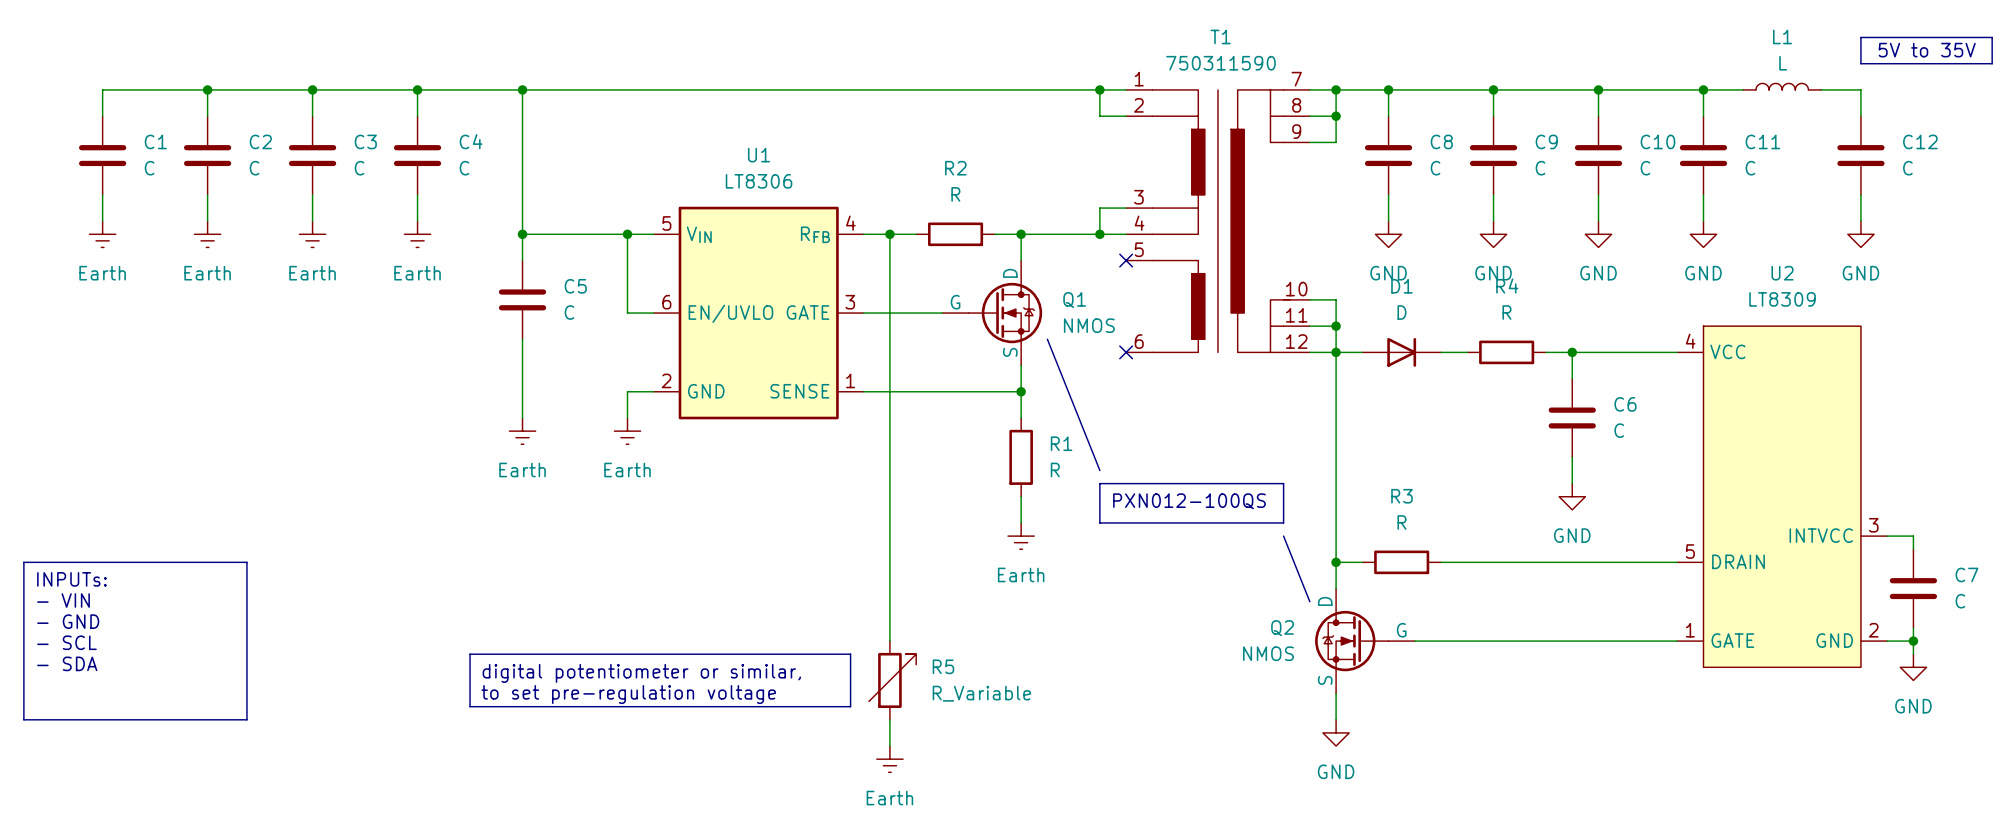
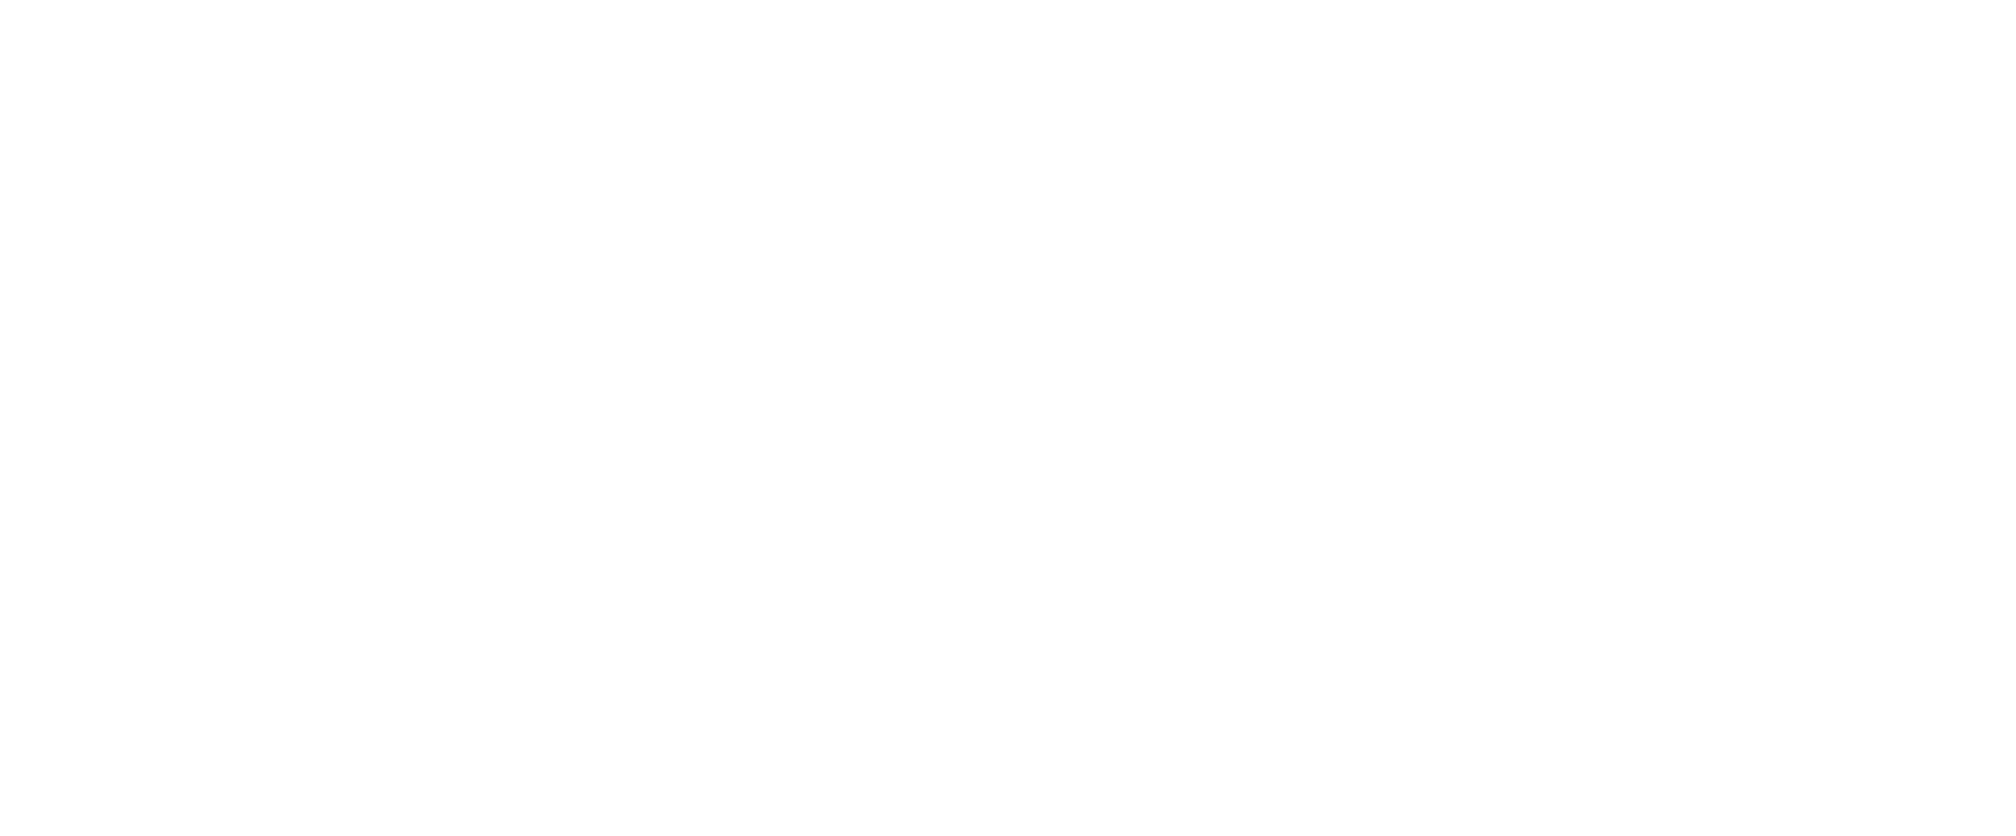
line: (1860, 37) (1992, 37) (1992, 63) (1860, 63) (1860, 37) -> none
text: 5V to 35V (1927, 50) -> none
L1: L (1782, 86) -> none
wire: (207, 89) (207, 116) -> none
junction: (207, 89) -> none
wire: (312, 89) (312, 116) -> none
junction: (312, 89) -> none
wire: (417, 89) (417, 116) -> none
junction: (417, 89) -> none
wire: (522, 89) (522, 260) -> none
junction: (522, 89) -> none
wire: (1099, 89) (1099, 116) (1126, 116) -> none
junction: (1099, 89) -> none
wire: (1126, 89) (102, 89) (102, 116) -> none
wire: (1309, 89) (1742, 89) -> none
wire: (1336, 89) (1336, 142) (1309, 142) -> none
junction: (1336, 89) -> none
wire: (1388, 89) (1388, 116) -> none
junction: (1388, 89) -> none
wire: (1493, 89) (1493, 116) -> none
junction: (1493, 89) -> none
wire: (1598, 89) (1598, 116) -> none
junction: (1598, 89) -> none
wire: (1703, 89) (1703, 116) -> none
junction: (1703, 89) -> none
wire: (1821, 89) (1860, 89) (1860, 116) -> none
wire: (1309, 116) (1336, 116) -> none
junction: (1336, 116) -> none
C1: C (102, 155) -> none
C2: C (207, 155) -> none
C3: C (312, 155) -> none
C4: C (417, 155) -> none
C8: C (1388, 155) -> none
C9: C (1493, 155) -> none
C10: C (1598, 155) -> none
C11: C (1703, 155) -> none
C12: C (1860, 155) -> none
wire: (102, 194) (102, 221) -> none
wire: (207, 194) (207, 221) -> none
wire: (312, 194) (312, 221) -> none
wire: (417, 194) (417, 221) -> none
wire: (1388, 194) (1388, 221) -> none
wire: (1493, 194) (1493, 221) -> none
wire: (1598, 194) (1598, 221) -> none
wire: (1703, 194) (1703, 221) -> none
wire: (1860, 194) (1860, 221) -> none
wire: (1126, 208) (1099, 208) (1099, 234) -> none
T1: 750311590 (1217, 221) -> none
power symbol: Earth (102, 234) -> none
power symbol: Earth (207, 234) -> none
power symbol: Earth (312, 234) -> none
power symbol: Earth (417, 234) -> none
wire: (522, 234) (653, 234) -> none
junction: (522, 234) -> none
wire: (627, 234) (627, 313) (653, 313) -> none
junction: (627, 234) -> none
wire: (863, 234) (916, 234) -> none
wire: (889, 234) (889, 641) -> none
junction: (889, 234) -> none
R2: R (955, 234) -> none
wire: (994, 234) (1126, 234) -> none
wire: (1021, 234) (1021, 260) -> none
junction: (1021, 234) -> none
junction: (1099, 234) -> none
power symbol: GND (1388, 234) -> none
power symbol: GND (1493, 234) -> none
power symbol: GND (1598, 234) -> none
power symbol: GND (1703, 234) -> none
power symbol: GND (1860, 234) -> none
no-connect mark: (1126, 260) -> none
C5: C (522, 299) -> none
wire: (1309, 299) (1336, 299) (1336, 588) -> none
U1: LT8306 (758, 313) -> none
wire: (863, 313) (942, 313) -> none
Q1: NMOS (992, 313) -> none
wire: (1309, 326) (1336, 326) -> none
junction: (1336, 326) -> none
wire: (522, 339) (522, 418) -> none
line: (1047, 339) (1099, 470) -> none
no-connect mark: (1126, 352) -> none
wire: (1309, 352) (1362, 352) -> none
junction: (1336, 352) -> none
D1: D (1401, 352) -> none
wire: (1441, 352) (1467, 352) -> none
R4: R (1506, 352) -> none
wire: (1546, 352) (1677, 352) -> none
wire: (1572, 352) (1572, 378) -> none
junction: (1572, 352) -> none
wire: (1021, 365) (1021, 418) -> none
wire: (653, 391) (627, 391) (627, 418) -> none
wire: (863, 391) (1021, 391) -> none
junction: (1021, 391) -> none
C6: C (1572, 418) -> none
power symbol: Earth (522, 431) -> none
power symbol: Earth (627, 431) -> none
R1: R (1021, 457) -> none
wire: (1572, 457) (1572, 483) -> none
line: (1099, 483) (1283, 483) (1283, 522) (1099, 522) (1099, 483) -> none
wire: (1021, 496) (1021, 522) -> none
power symbol: GND (1572, 496) -> none
U2: LT8309 (1782, 496) -> none
text: PXN012-100QS (1189, 501) -> none
power symbol: Earth (1021, 536) -> none
line: (1283, 536) (1309, 601) -> none
wire: (1887, 536) (1913, 536) (1913, 549) -> none
line: (23, 562) (246, 562) (246, 719) (23, 719) (23, 562) -> none
wire: (1336, 562) (1362, 562) -> none
junction: (1336, 562) -> none
R3: R (1401, 562) -> none
wire: (1441, 562) (1677, 562) -> none
text: INPUTs: (71, 579) -> none
C7: C (1913, 588) -> none
text: - VIN (63, 600) -> none
text: - GND (68, 621) -> none
wire: (1913, 627) (1913, 654) -> none
Q2: NMOS (1364, 641) -> none
wire: (1414, 641) (1677, 641) -> none
wire: (1887, 641) (1913, 641) -> none
junction: (1913, 641) -> none
text: - SCL (66, 642) -> none
line: (470, 654) (850, 654) (850, 706) (470, 706) (470, 654) -> none
text: - SDA (67, 663) -> none
power symbol: GND (1913, 667) -> none
text: digital potentiometer or similar, (641, 673) -> none
R5: R_Variable (892, 680) -> none
wire: (1336, 693) (1336, 719) -> none
text: to set pre-regulation voltage (628, 694) -> none
wire: (889, 719) (889, 746) -> none
power symbol: GND (1336, 732) -> none
power symbol: Earth (889, 759) -> none

